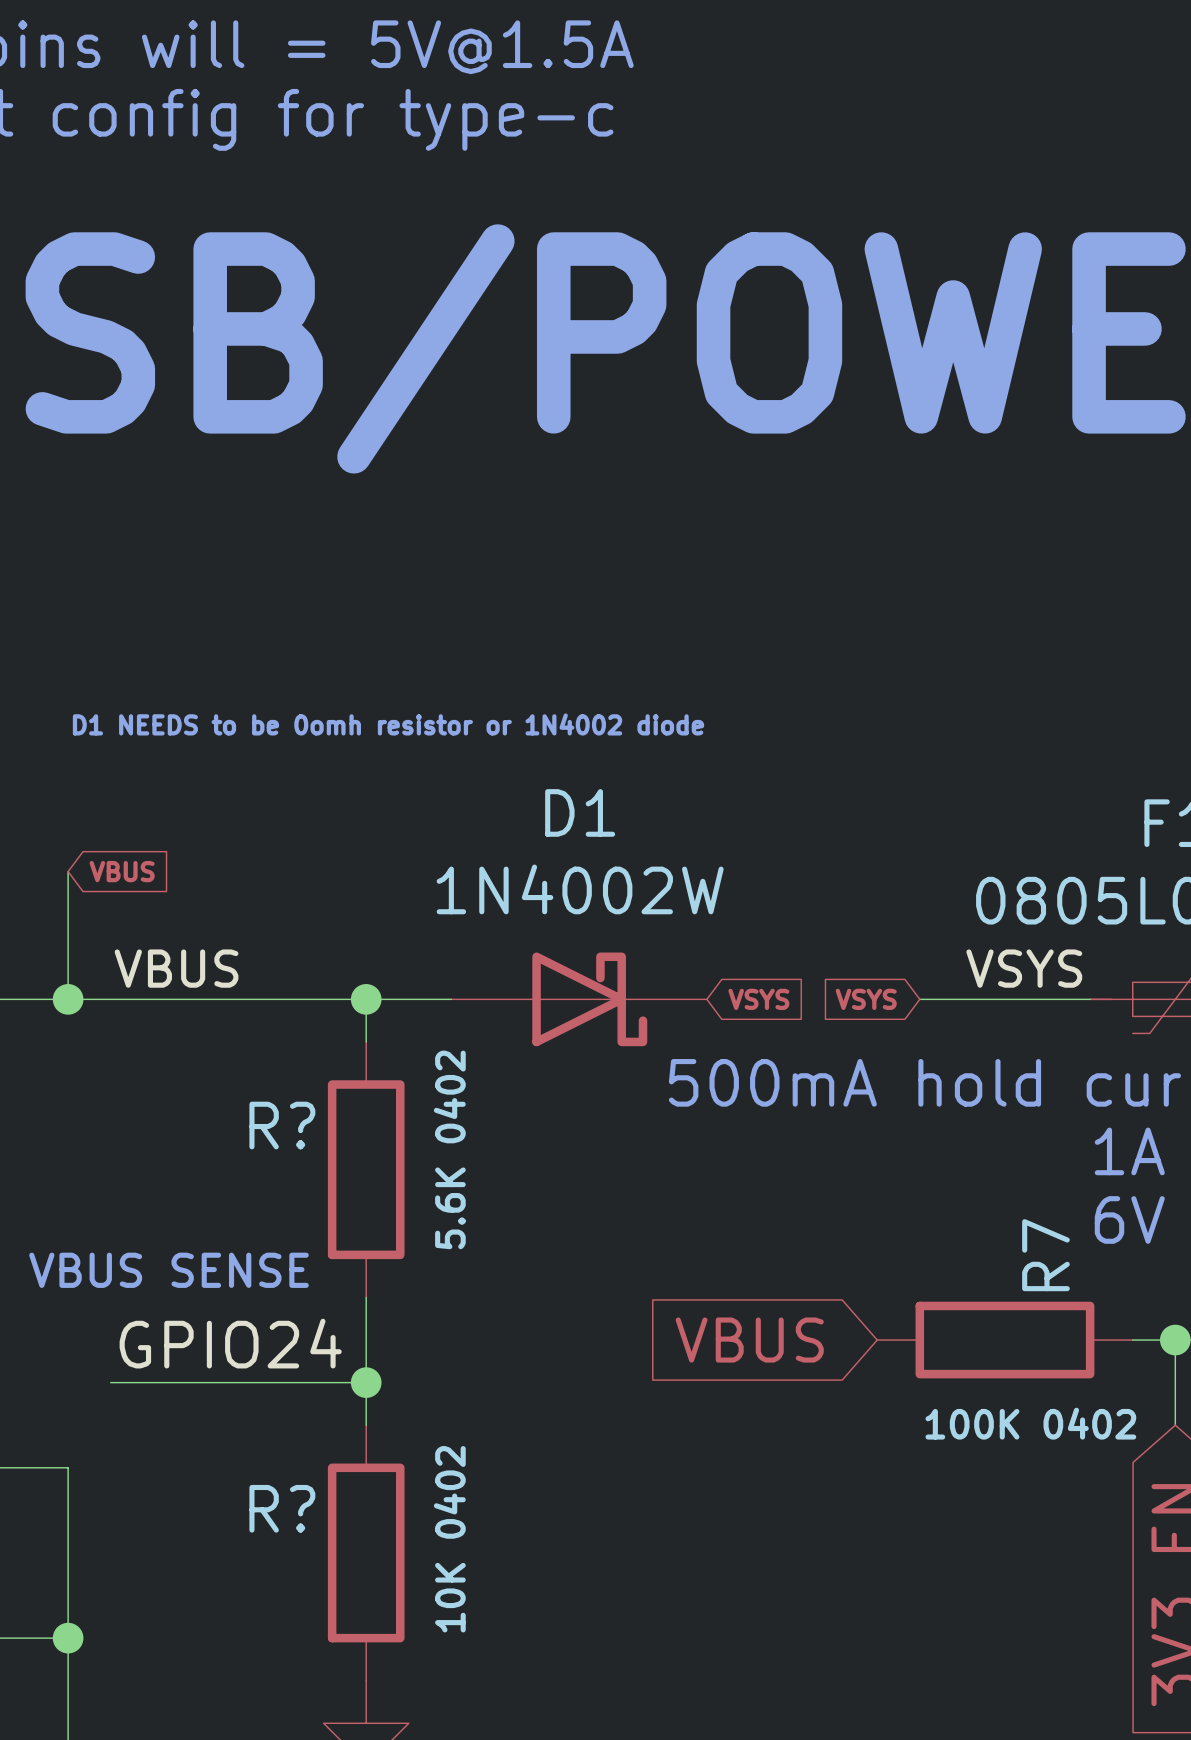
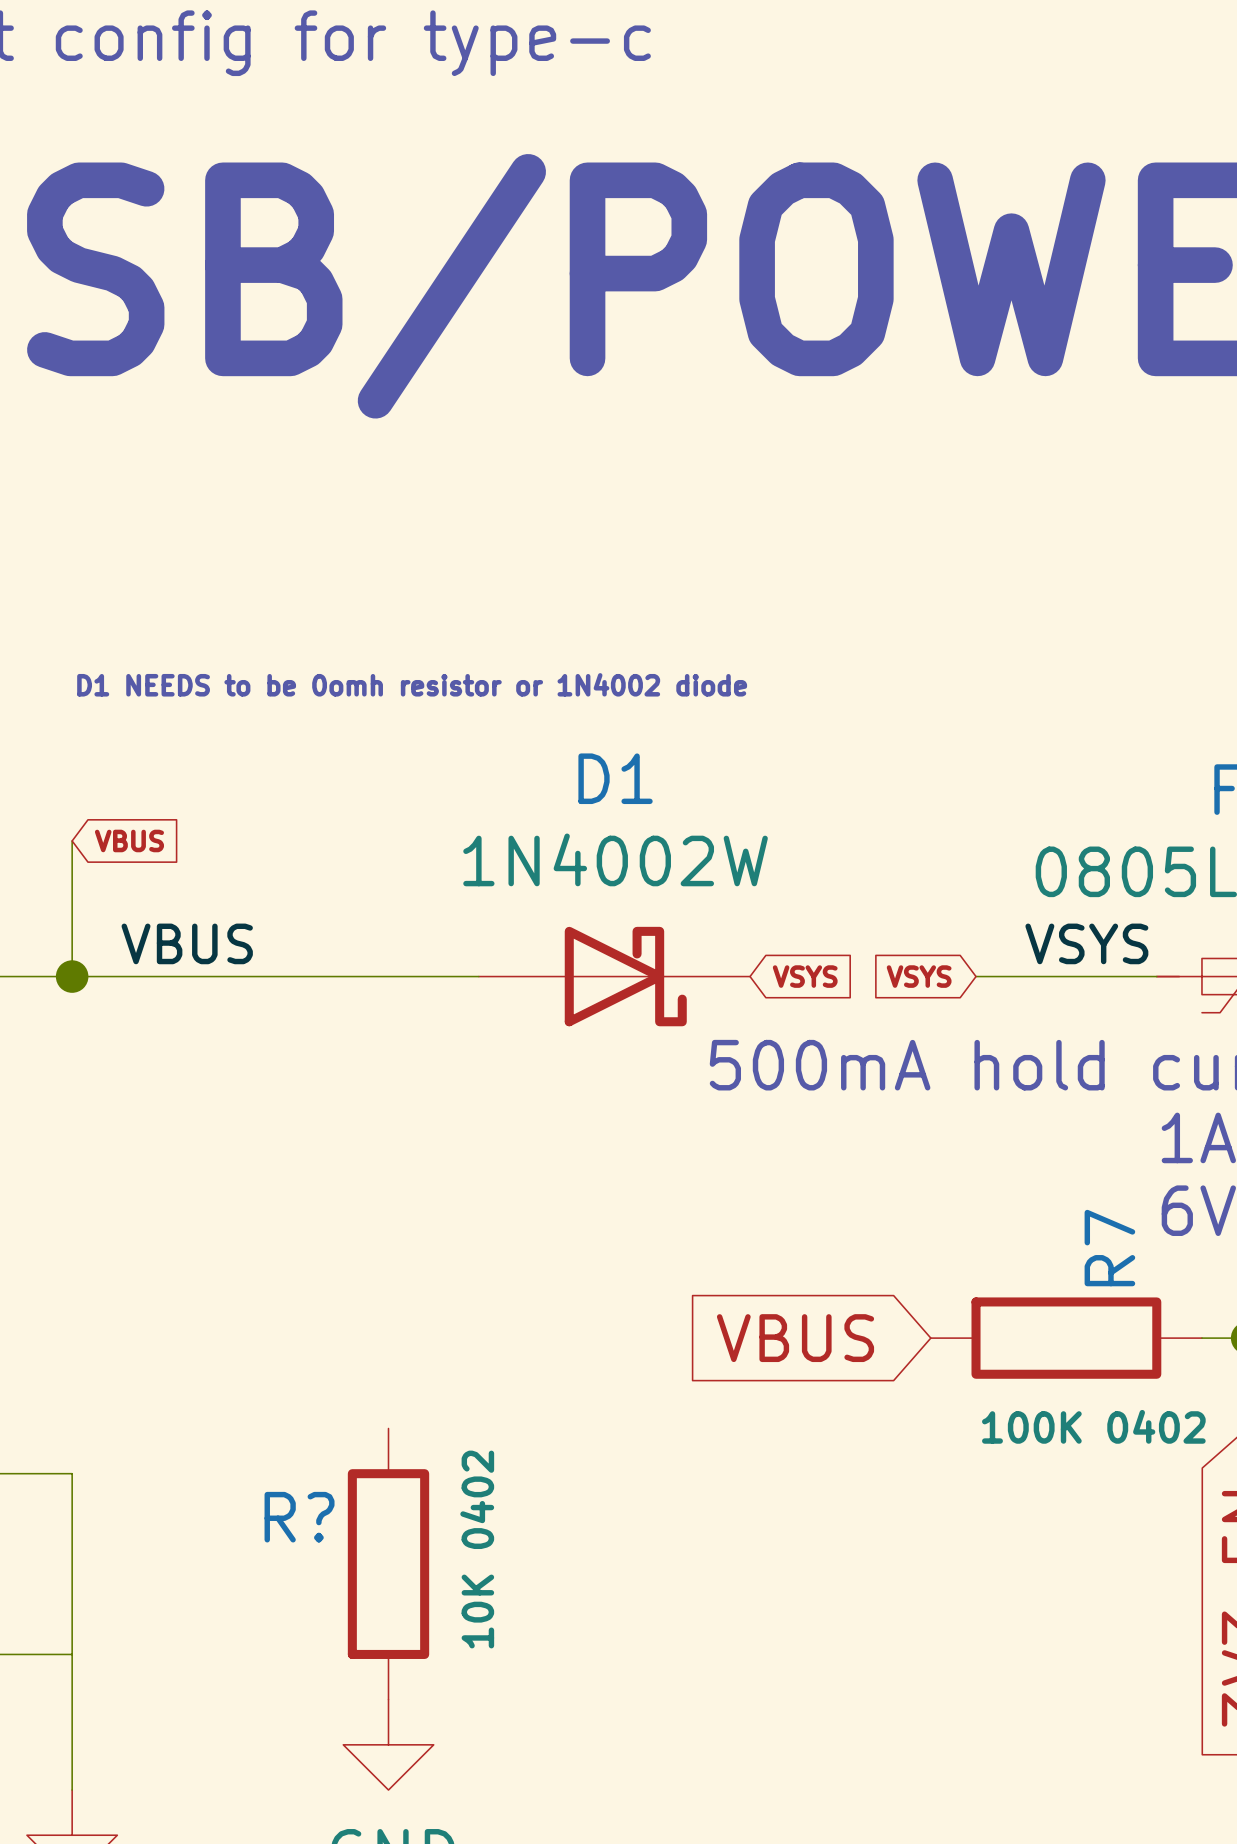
wire: (366, 999) (366, 1041) -> none
junction: (366, 999) -> none
R?: 5.6K 0402 (366, 1169) -> none
text: VBUS SENSE (169, 1270) -> none
wire: (366, 1297) (366, 1425) -> none
label: GPIO24 (230, 1343) -> none
wire: (110, 1382) (366, 1382) -> none
junction: (366, 1382) -> none
junction: (68, 1638) -> none

